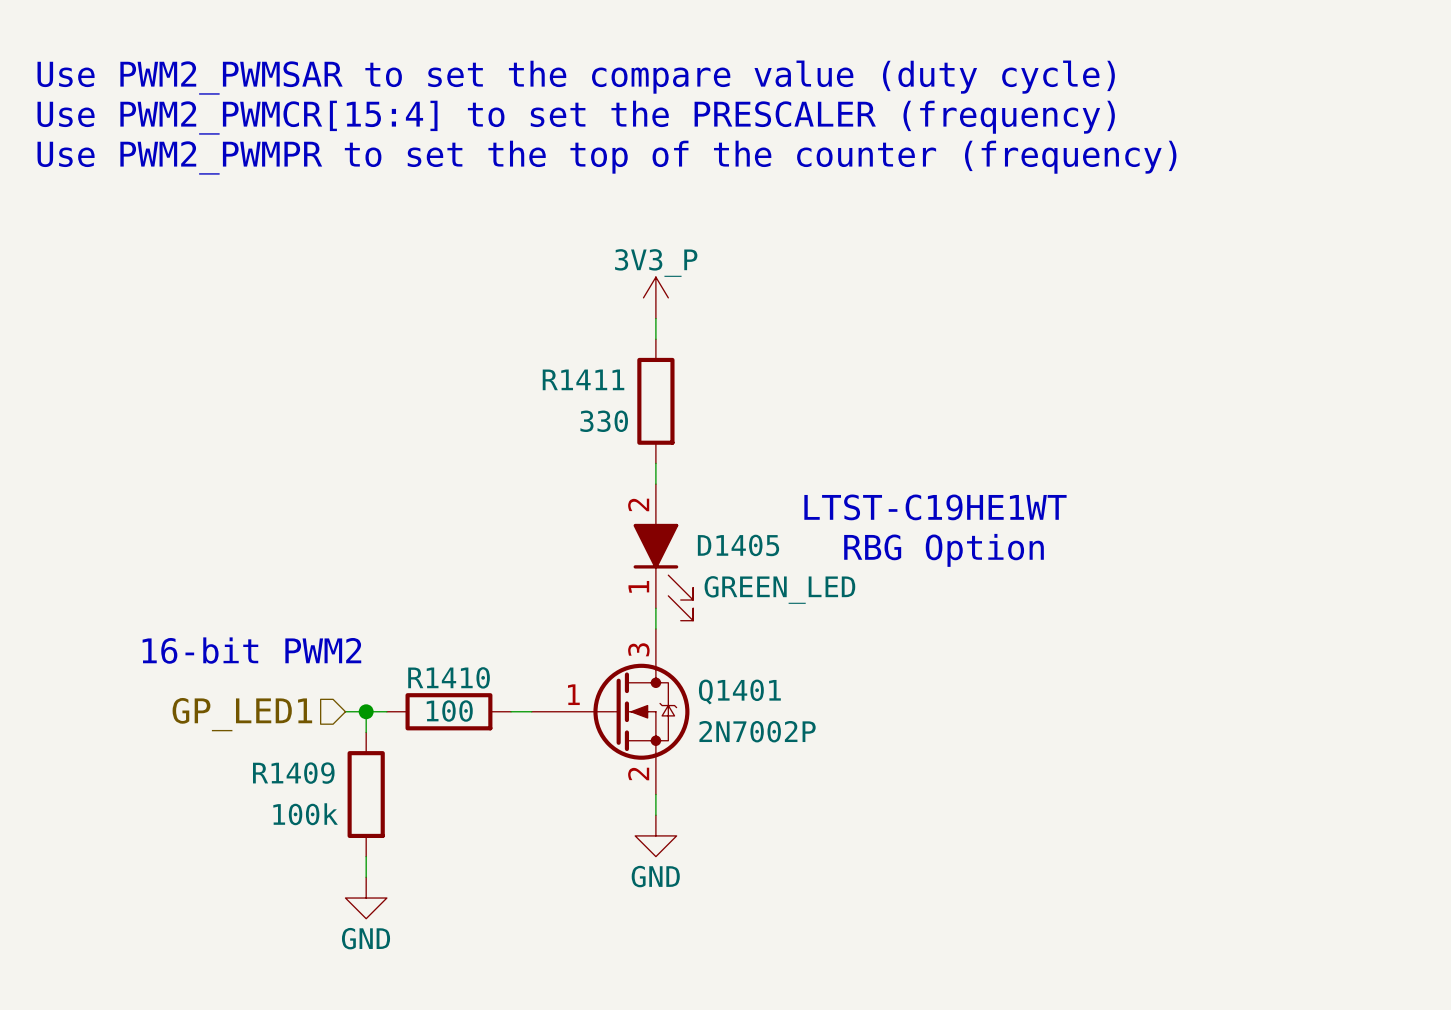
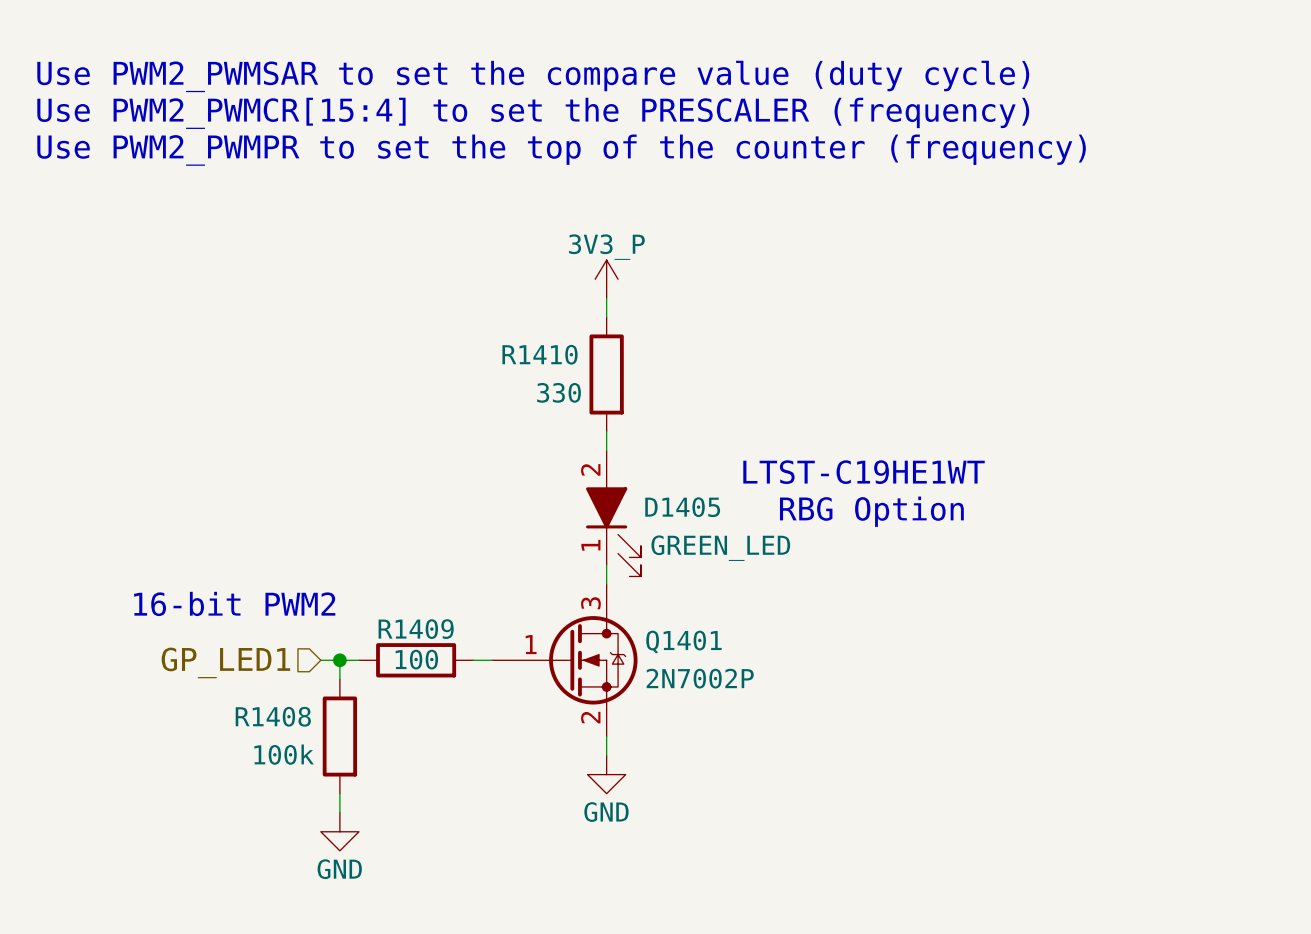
R1411 name: R1411 (583, 379) -> R1410 (540, 354)
R1410 name: R1410 (449, 677) -> R1409 (416, 629)
R1409 name: R1409 (293, 773) -> R1408 (273, 716)

